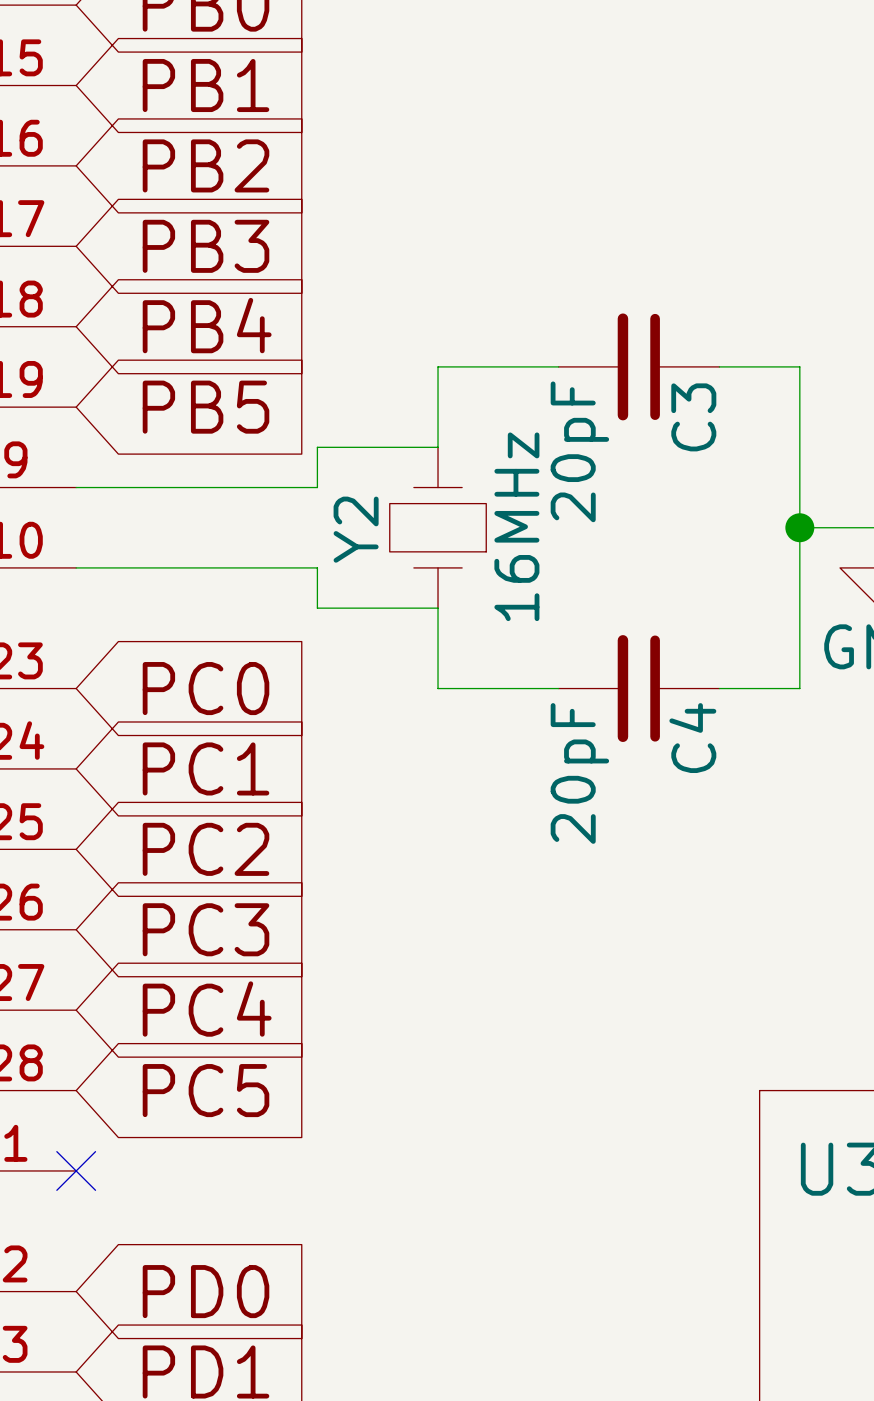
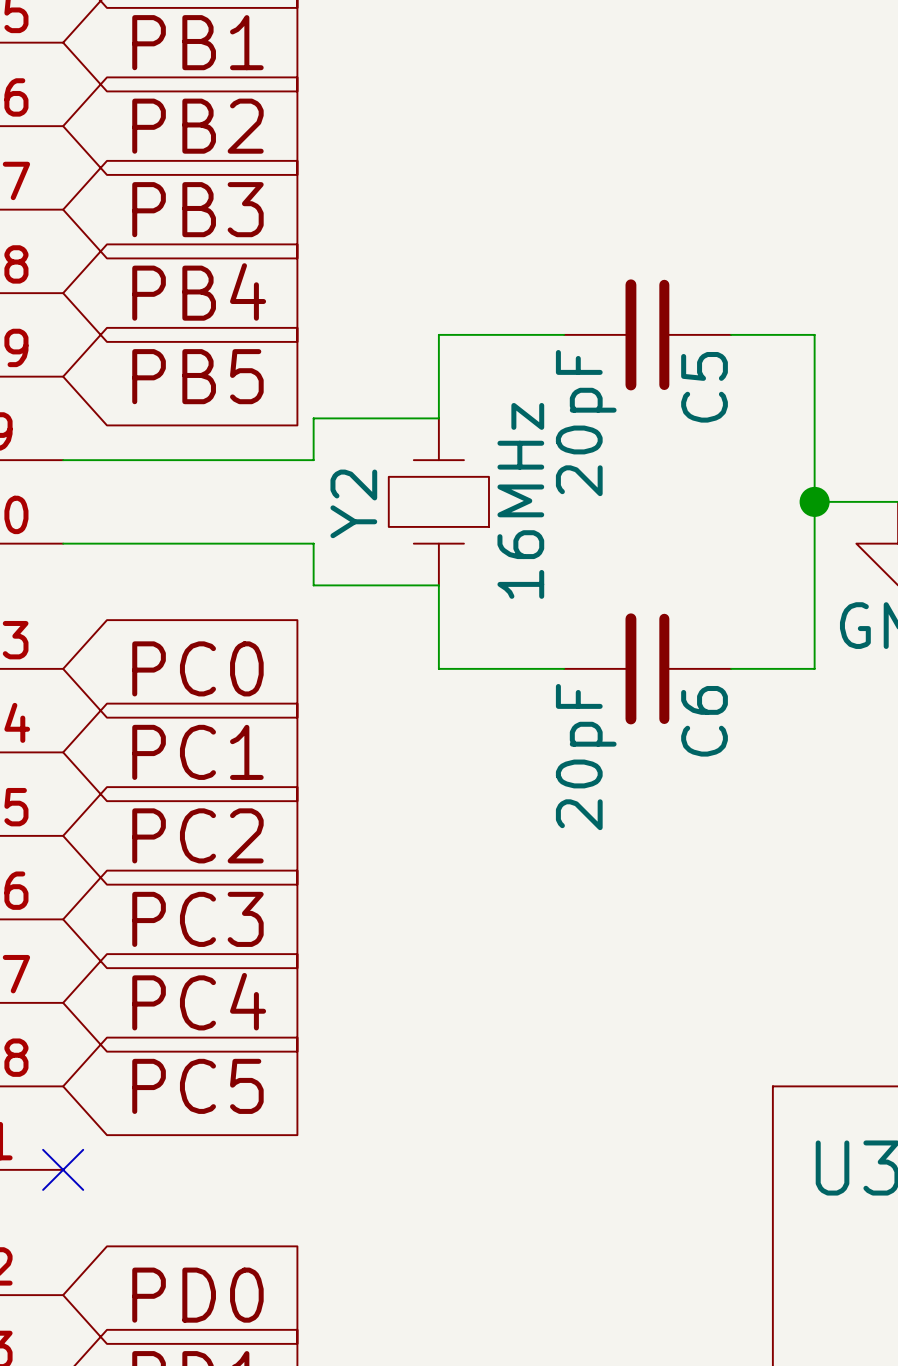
C3 name: C3 (693, 417) -> C5 (704, 387)
C4 name: C4 (692, 738) -> C6 (704, 721)

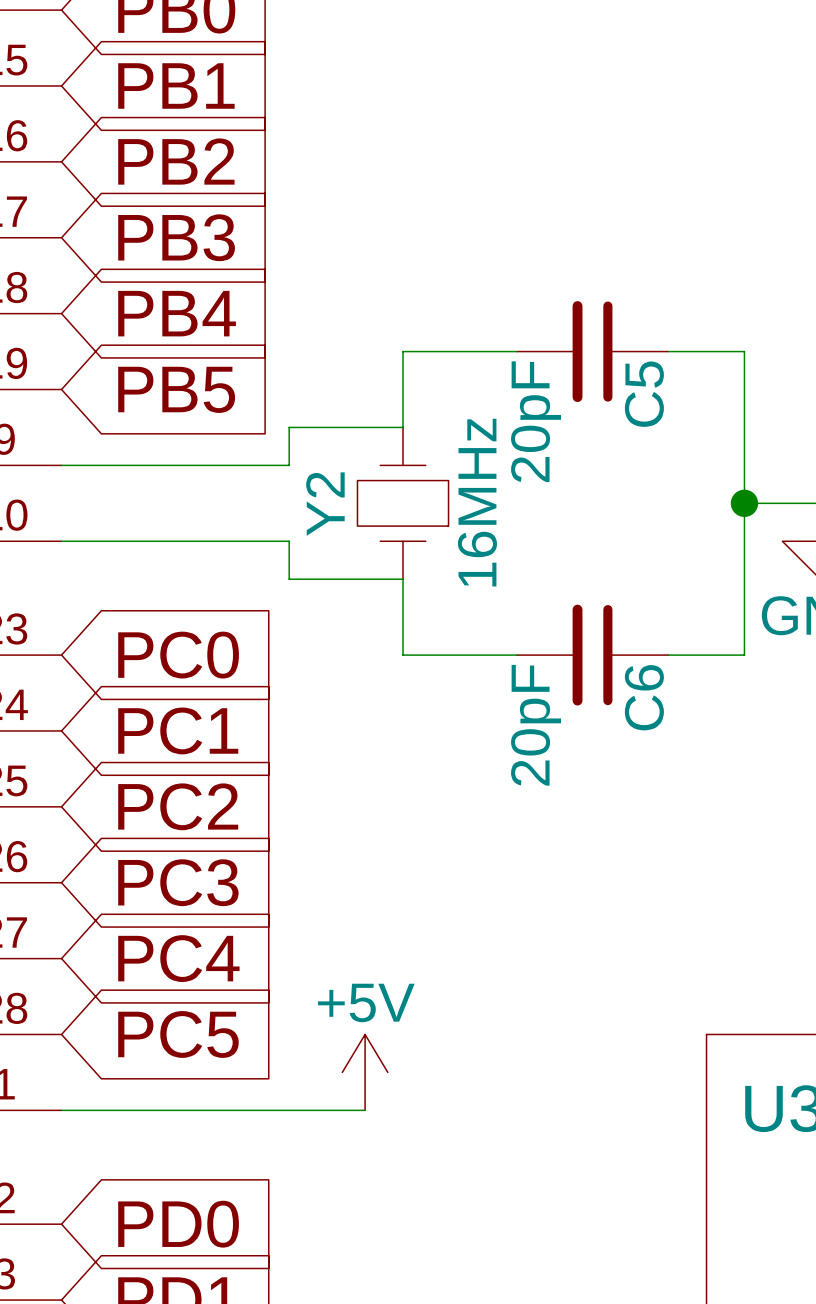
power symbol: none -> +5V (365, 1072)
wire: none -> (61, 1110) (365, 1110)
no-connect mark: (63, 1169) -> none

